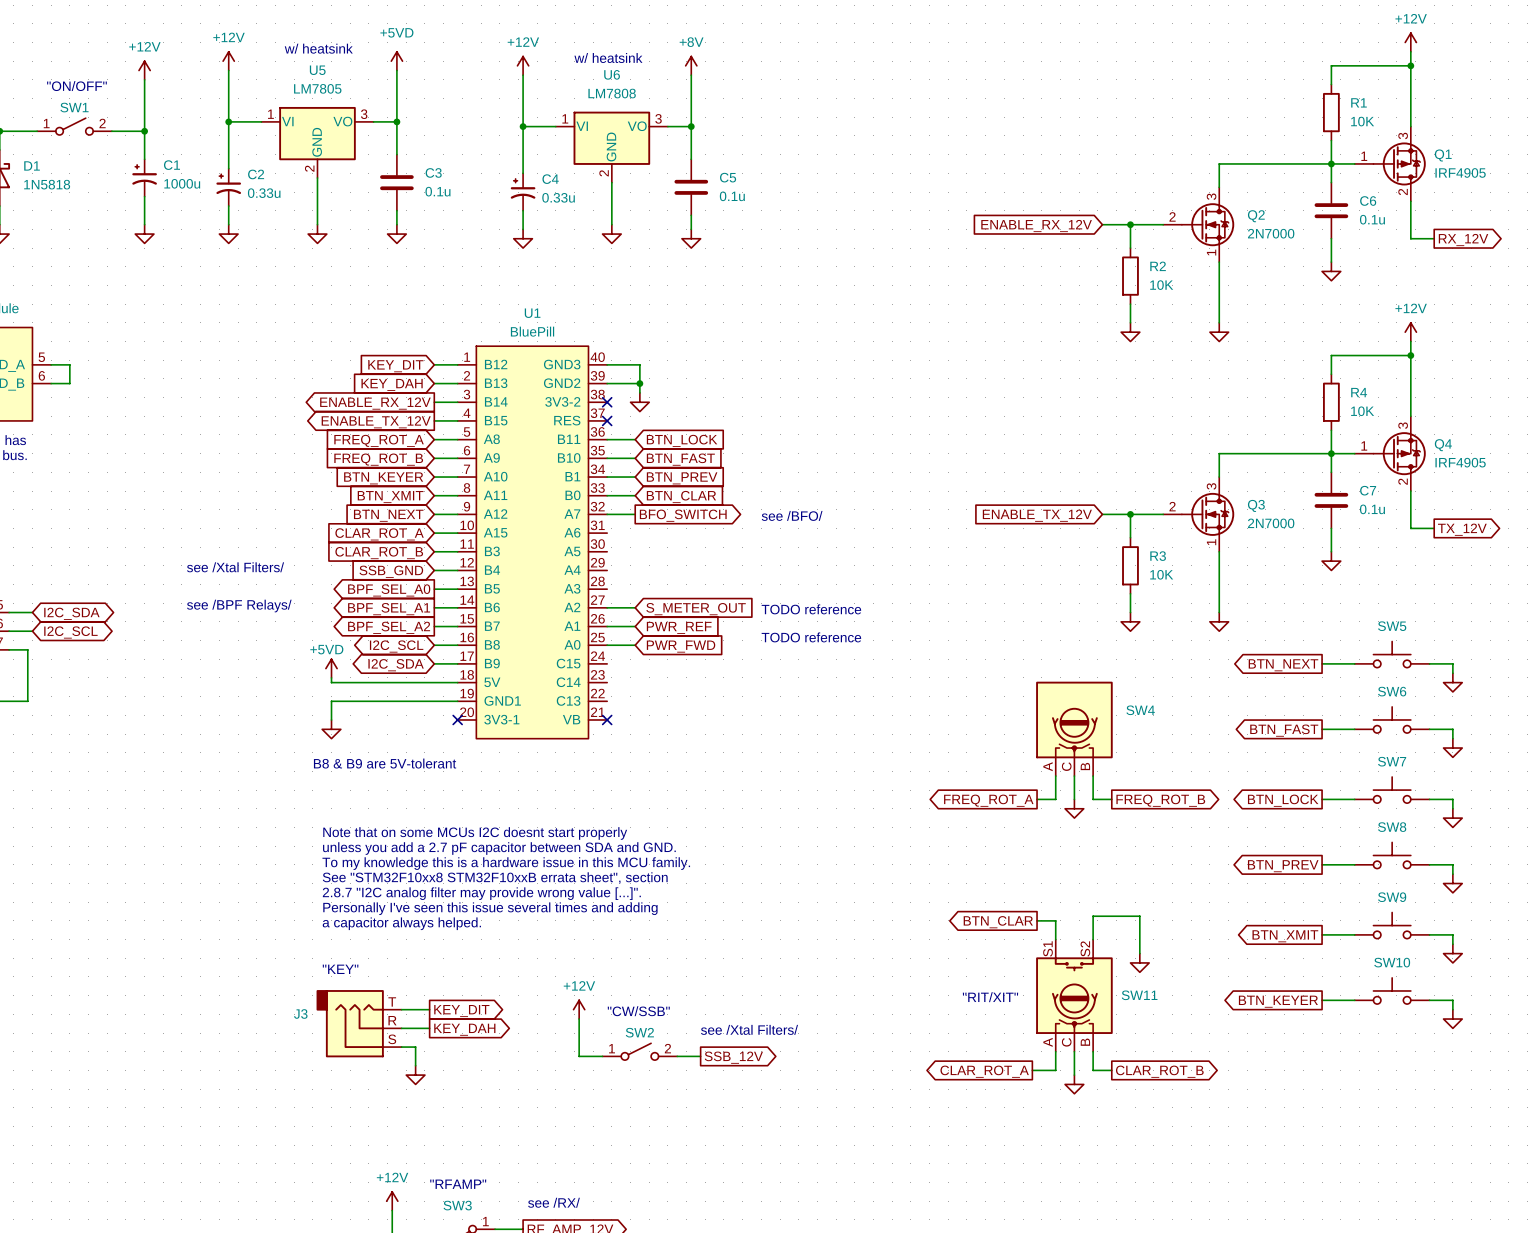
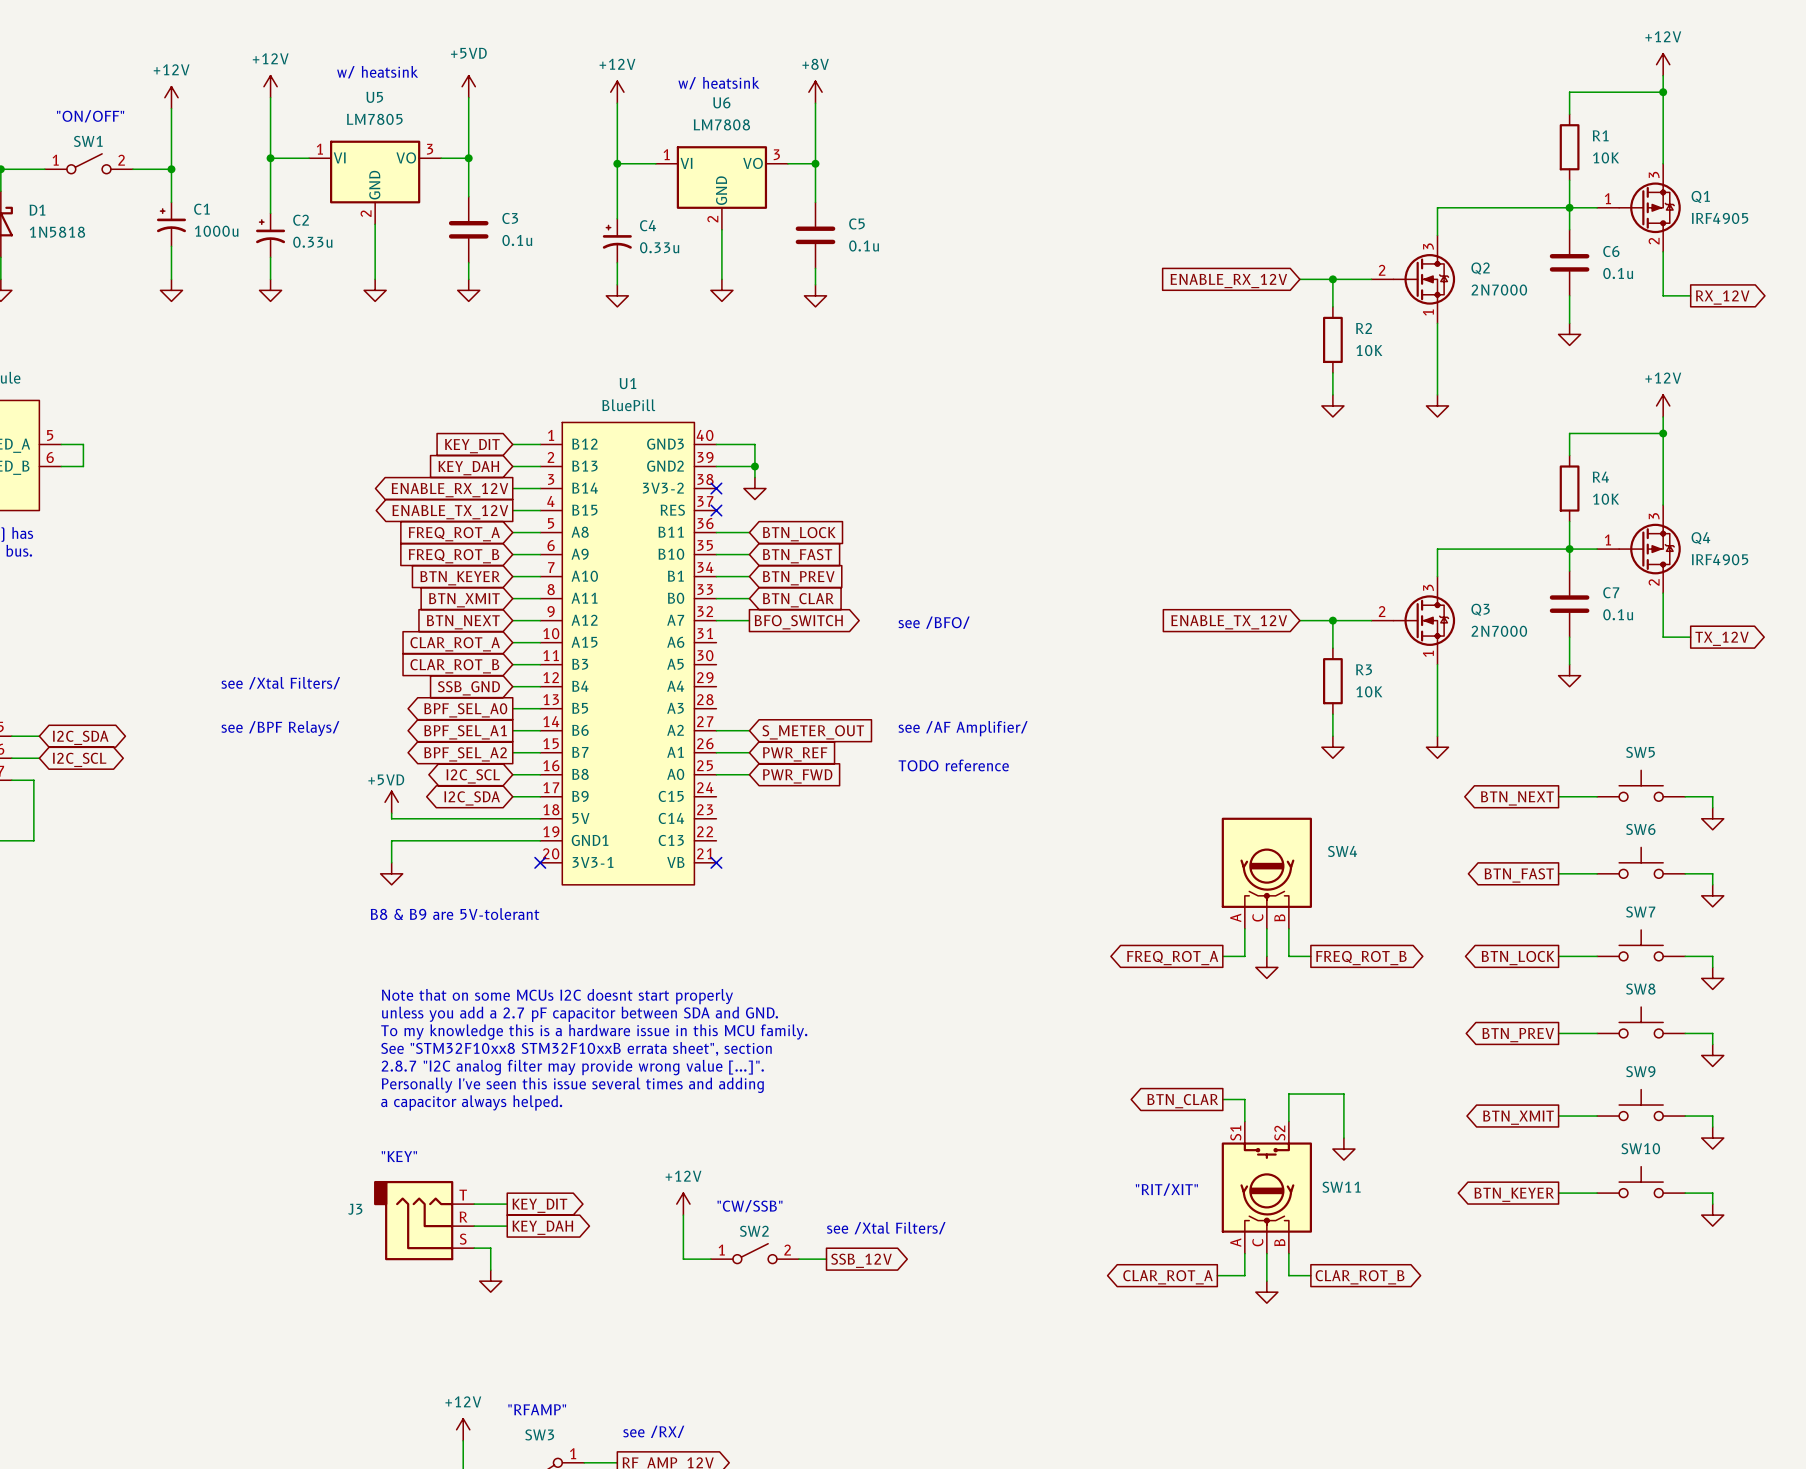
text: TODO reference (811, 609) -> see /AF Amplifier/ (963, 728)

